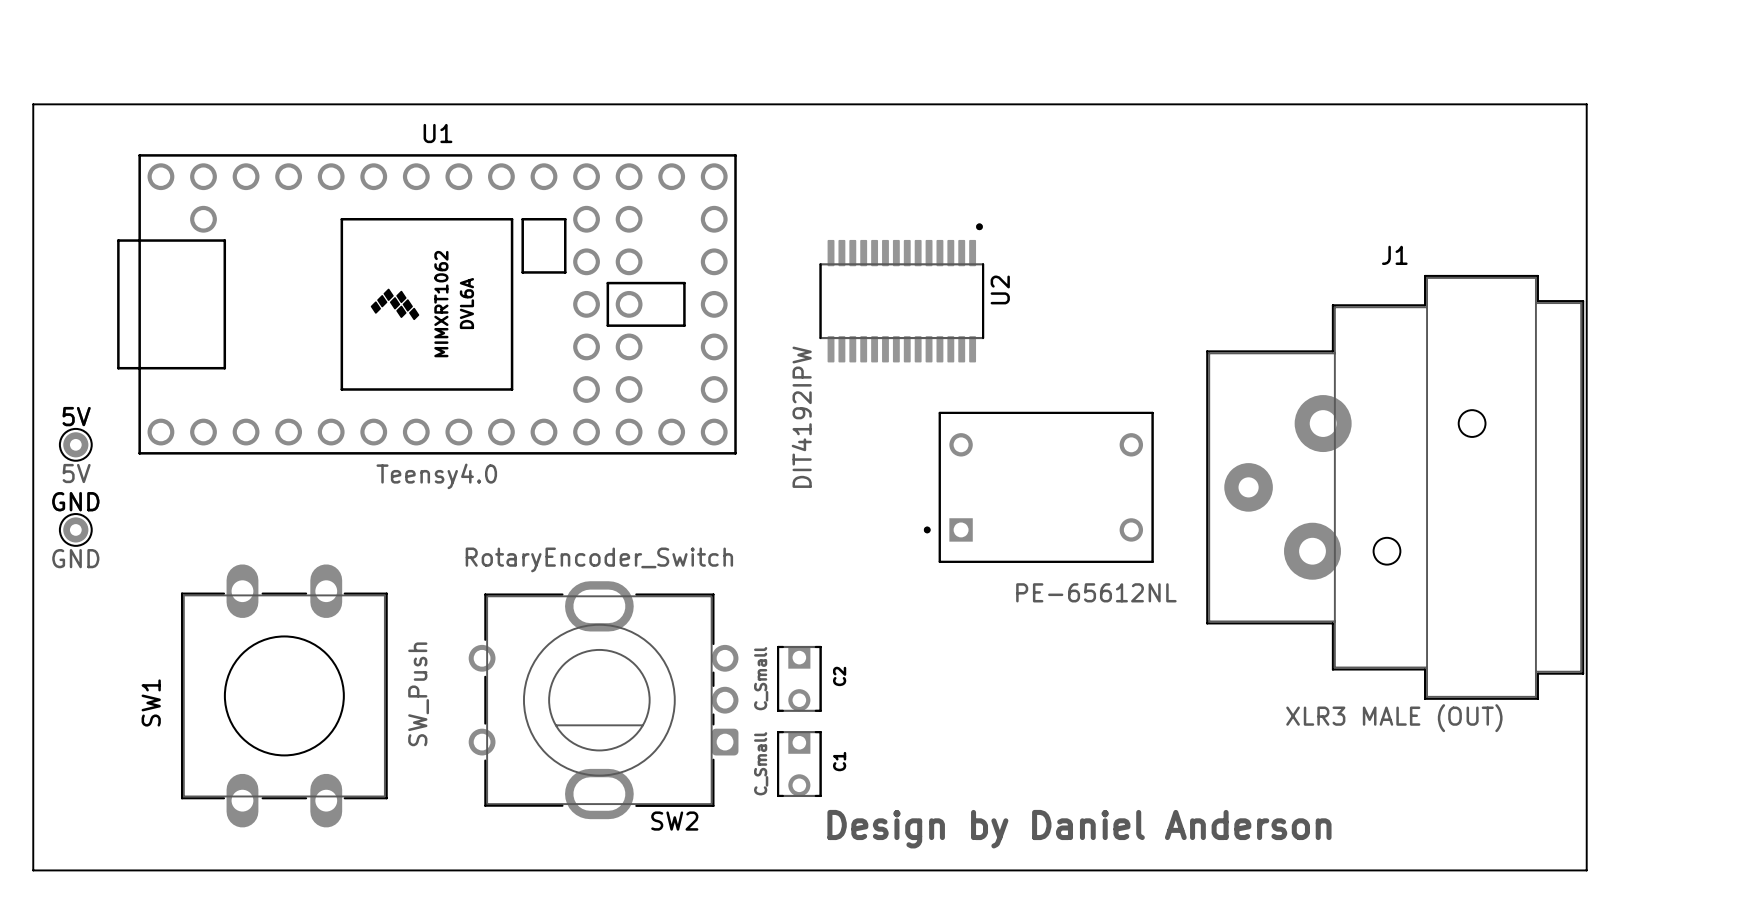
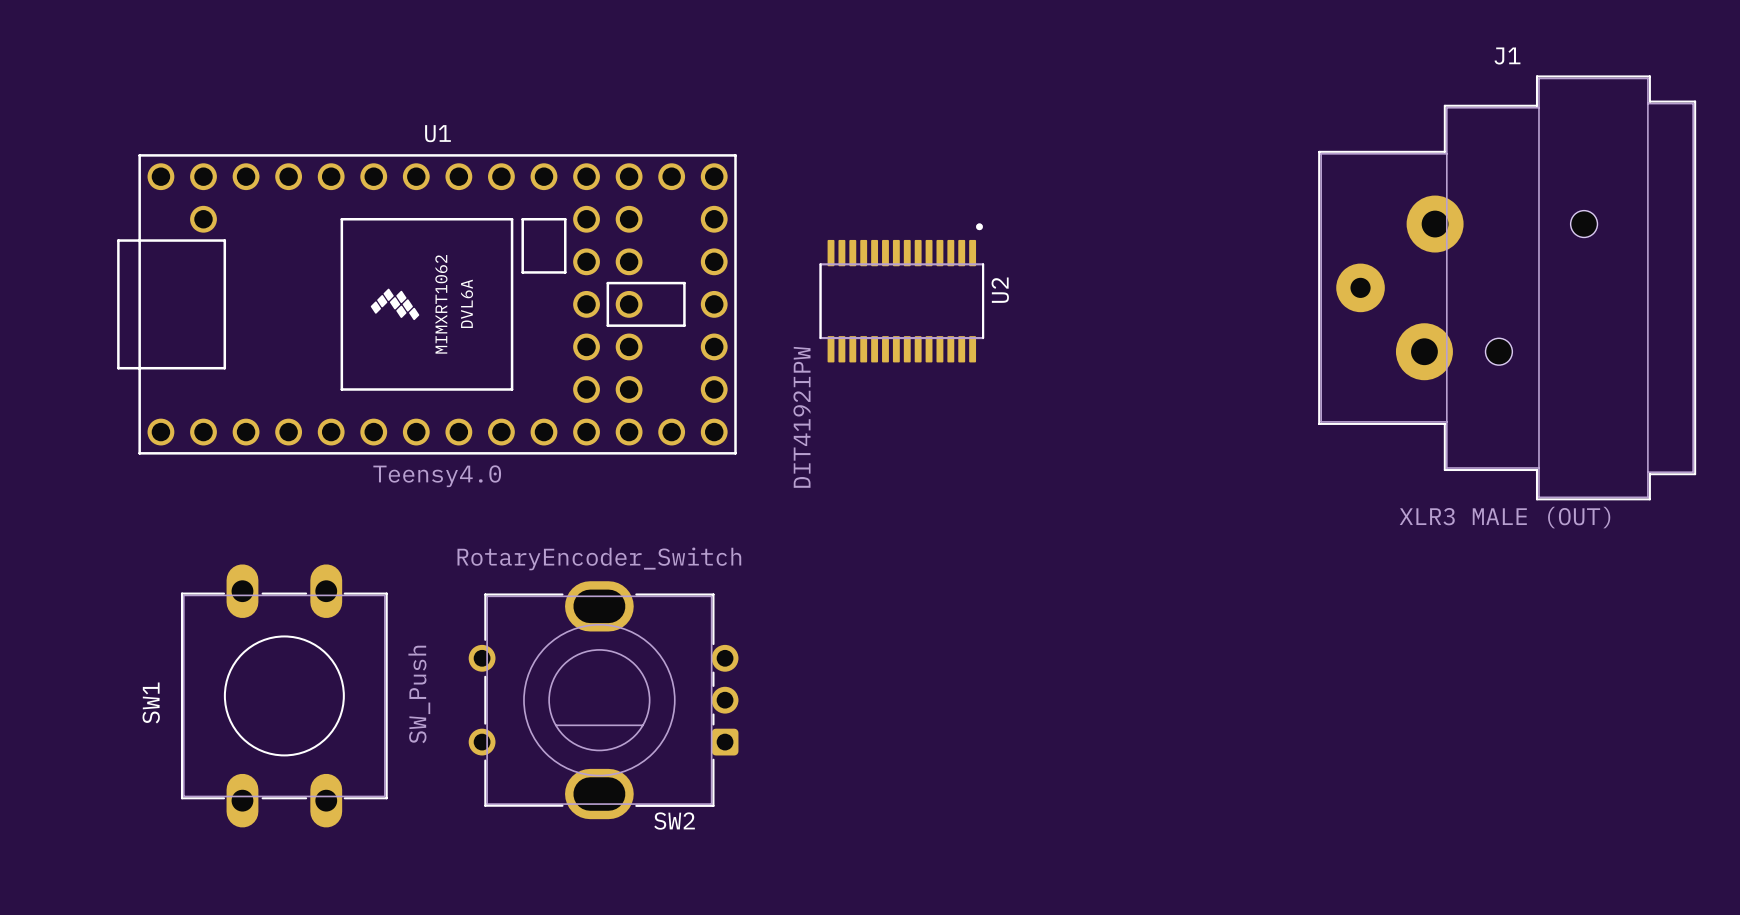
board edge: (33, 104) (1586, 104) (1586, 870) (33, 870) (33, 104) -> none
5V: 5V (75, 444) -> none
part: PE-65612NL (1038, 487) -> none
J1 position: (1395, 487) -> (1507, 287)
GND: GND (75, 529) -> none
C2: C_Small (799, 678) -> none
C1: C_Small (799, 764) -> none
text: Design by Daniel Anderson (1079, 829) -> none

